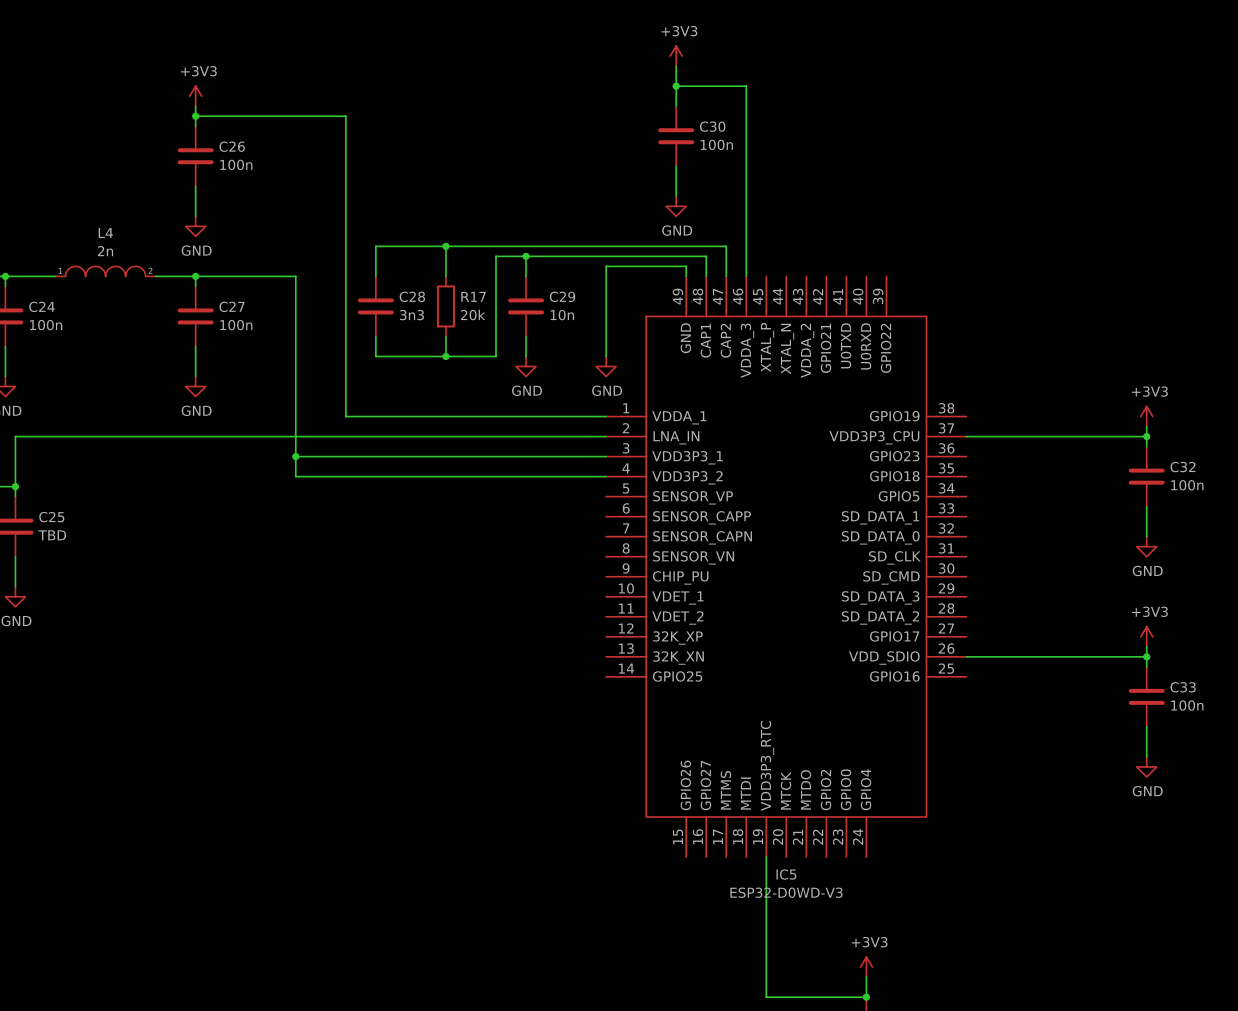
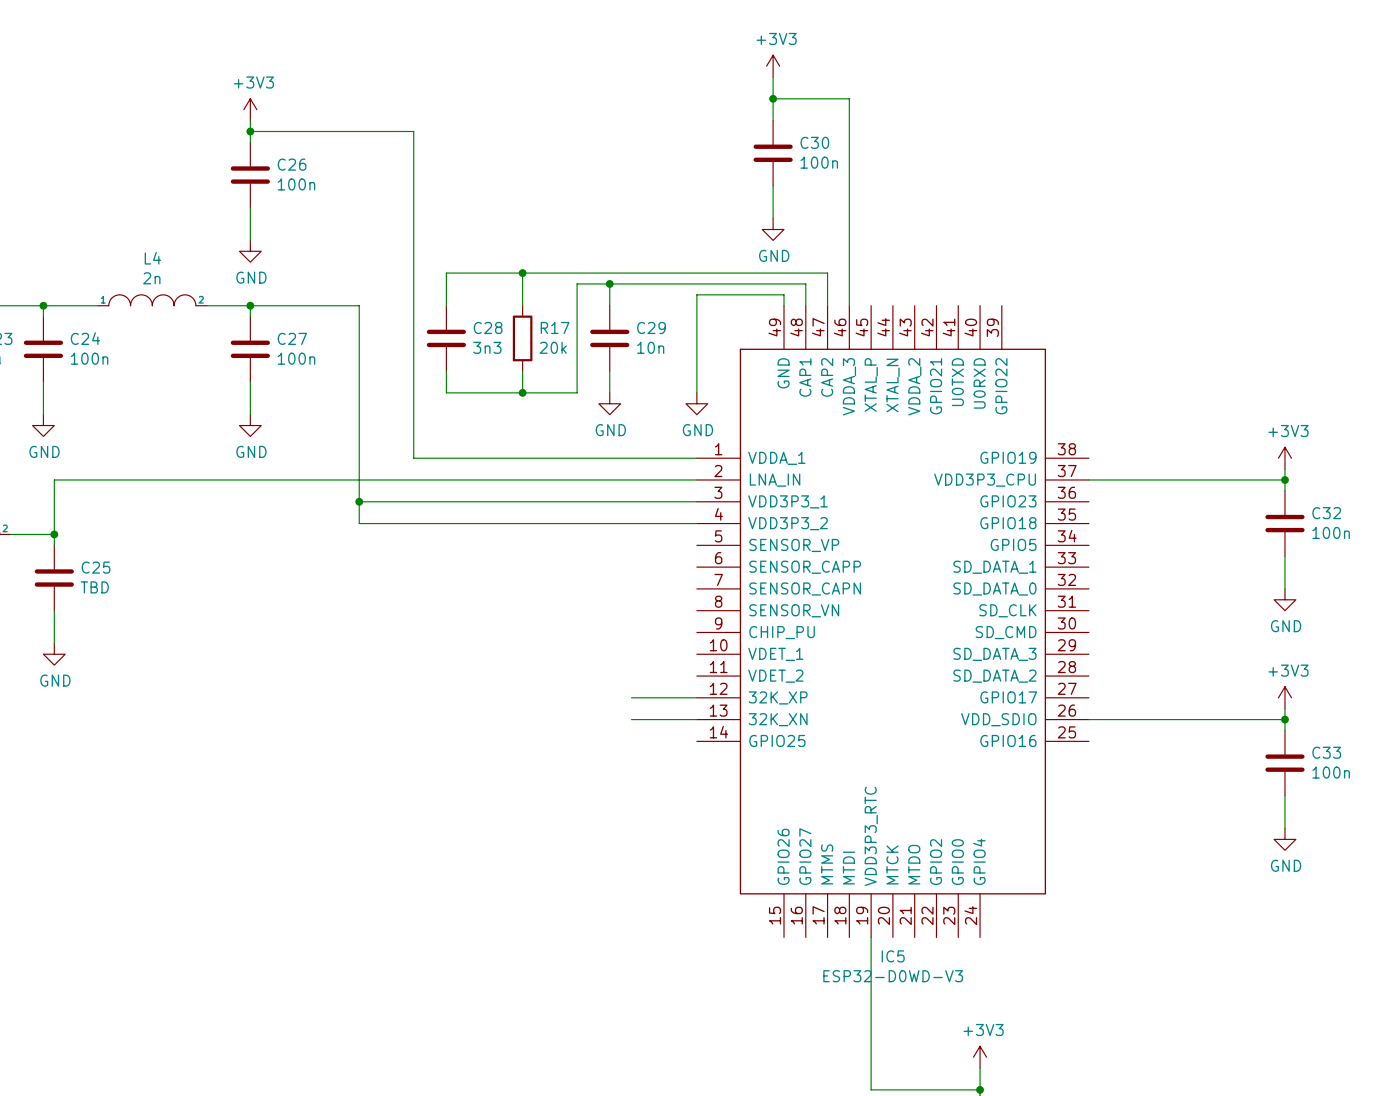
wire: none -> (631, 697) (696, 697)
wire: none -> (631, 719) (696, 719)

